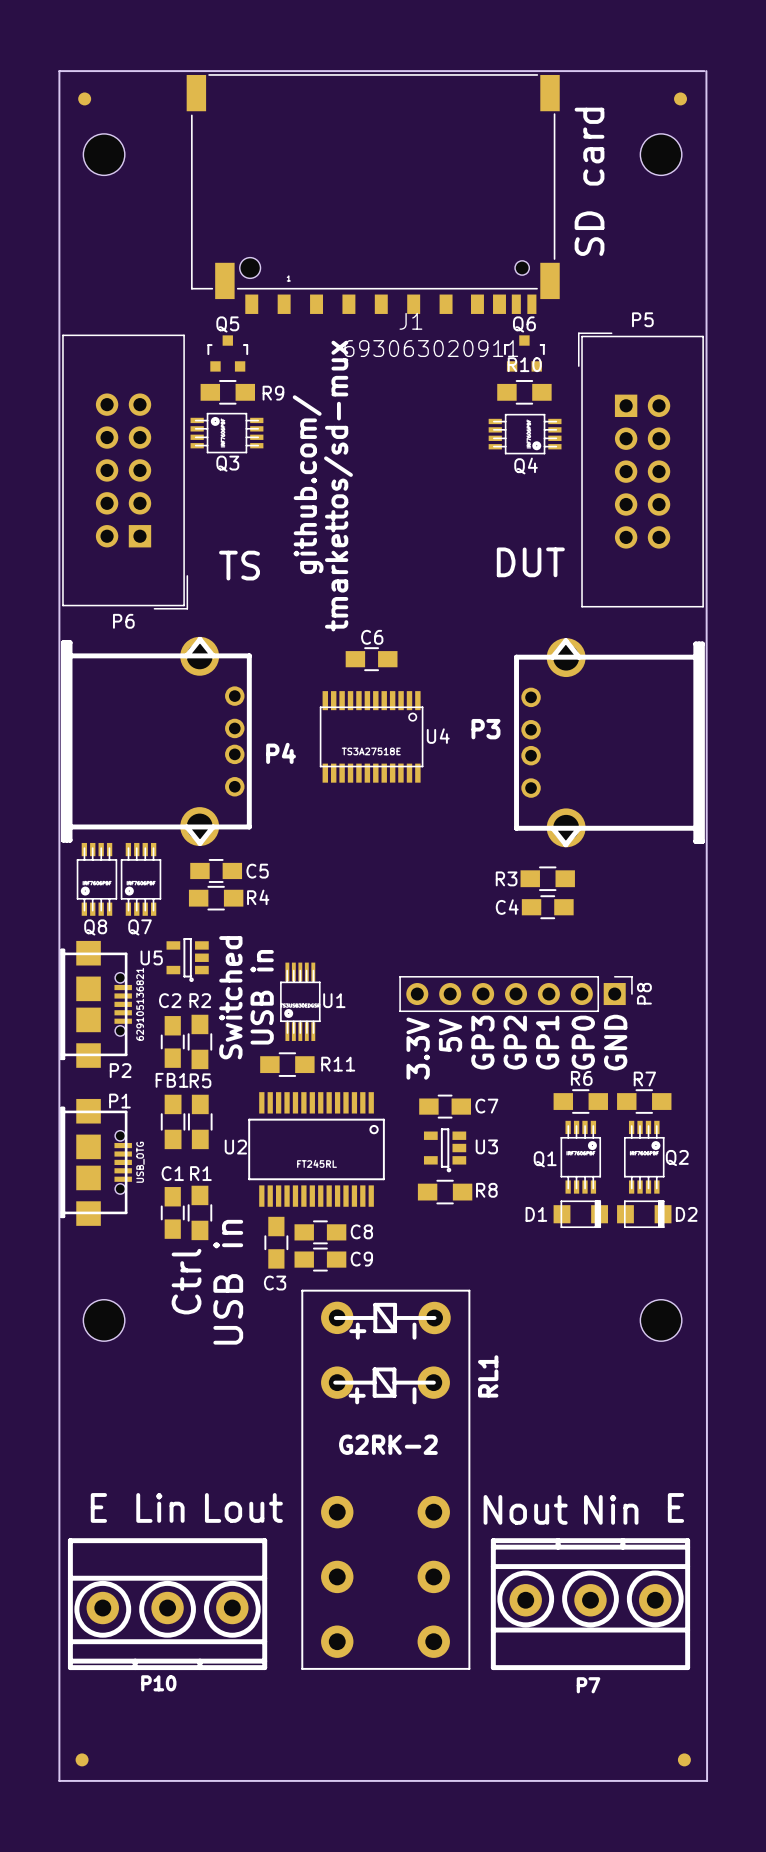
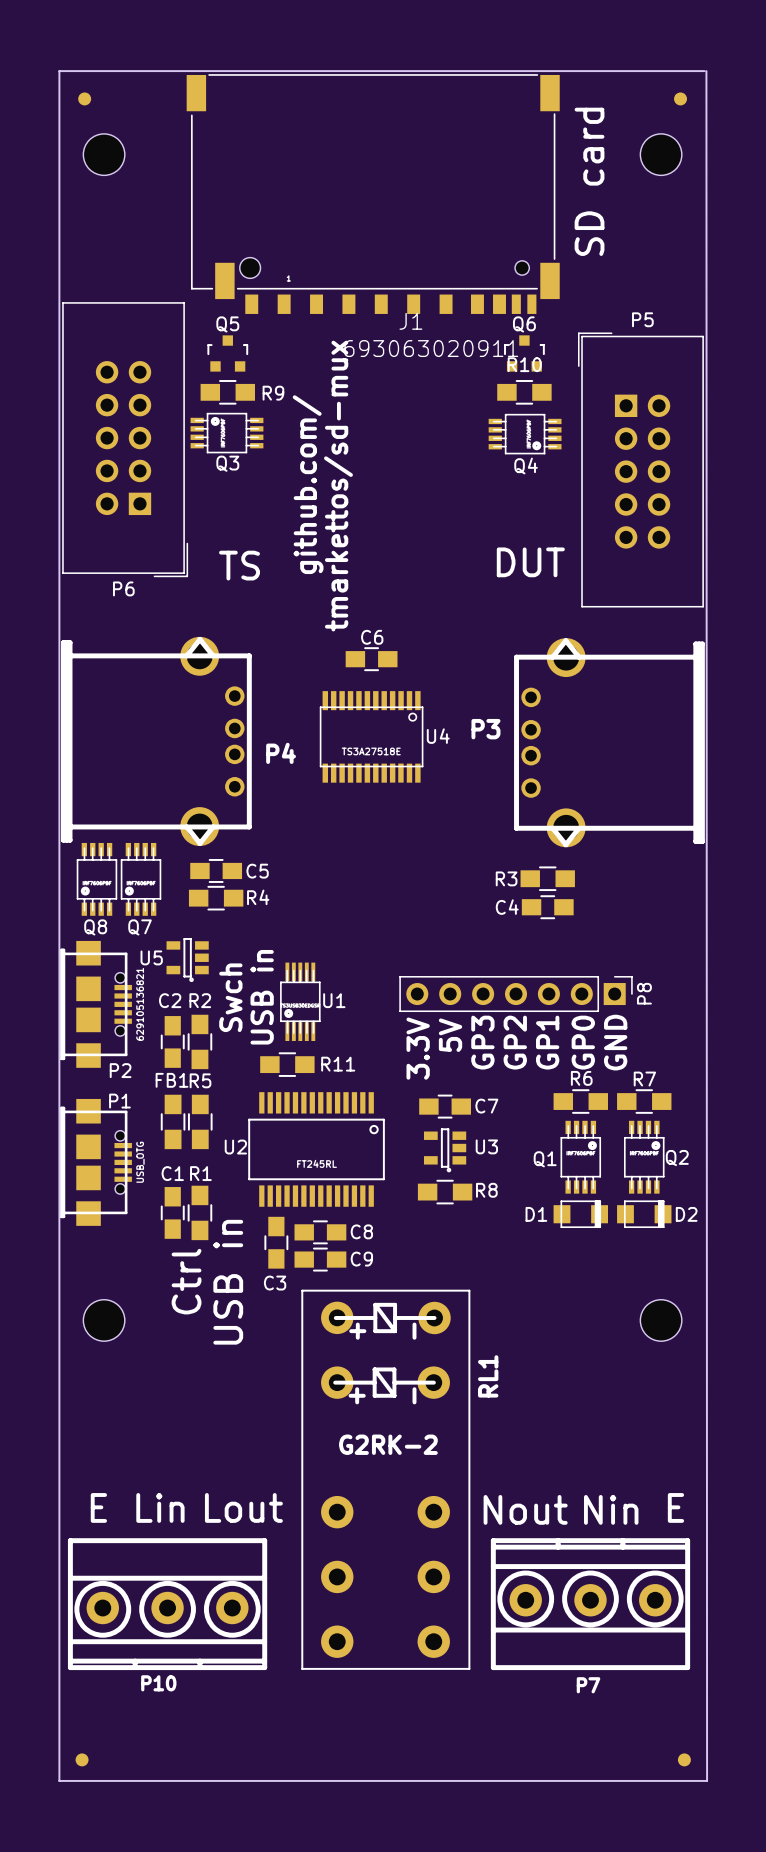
P6 position: (125, 472) -> (125, 439)
text: Switched (230, 997) -> Swch (230, 997)

